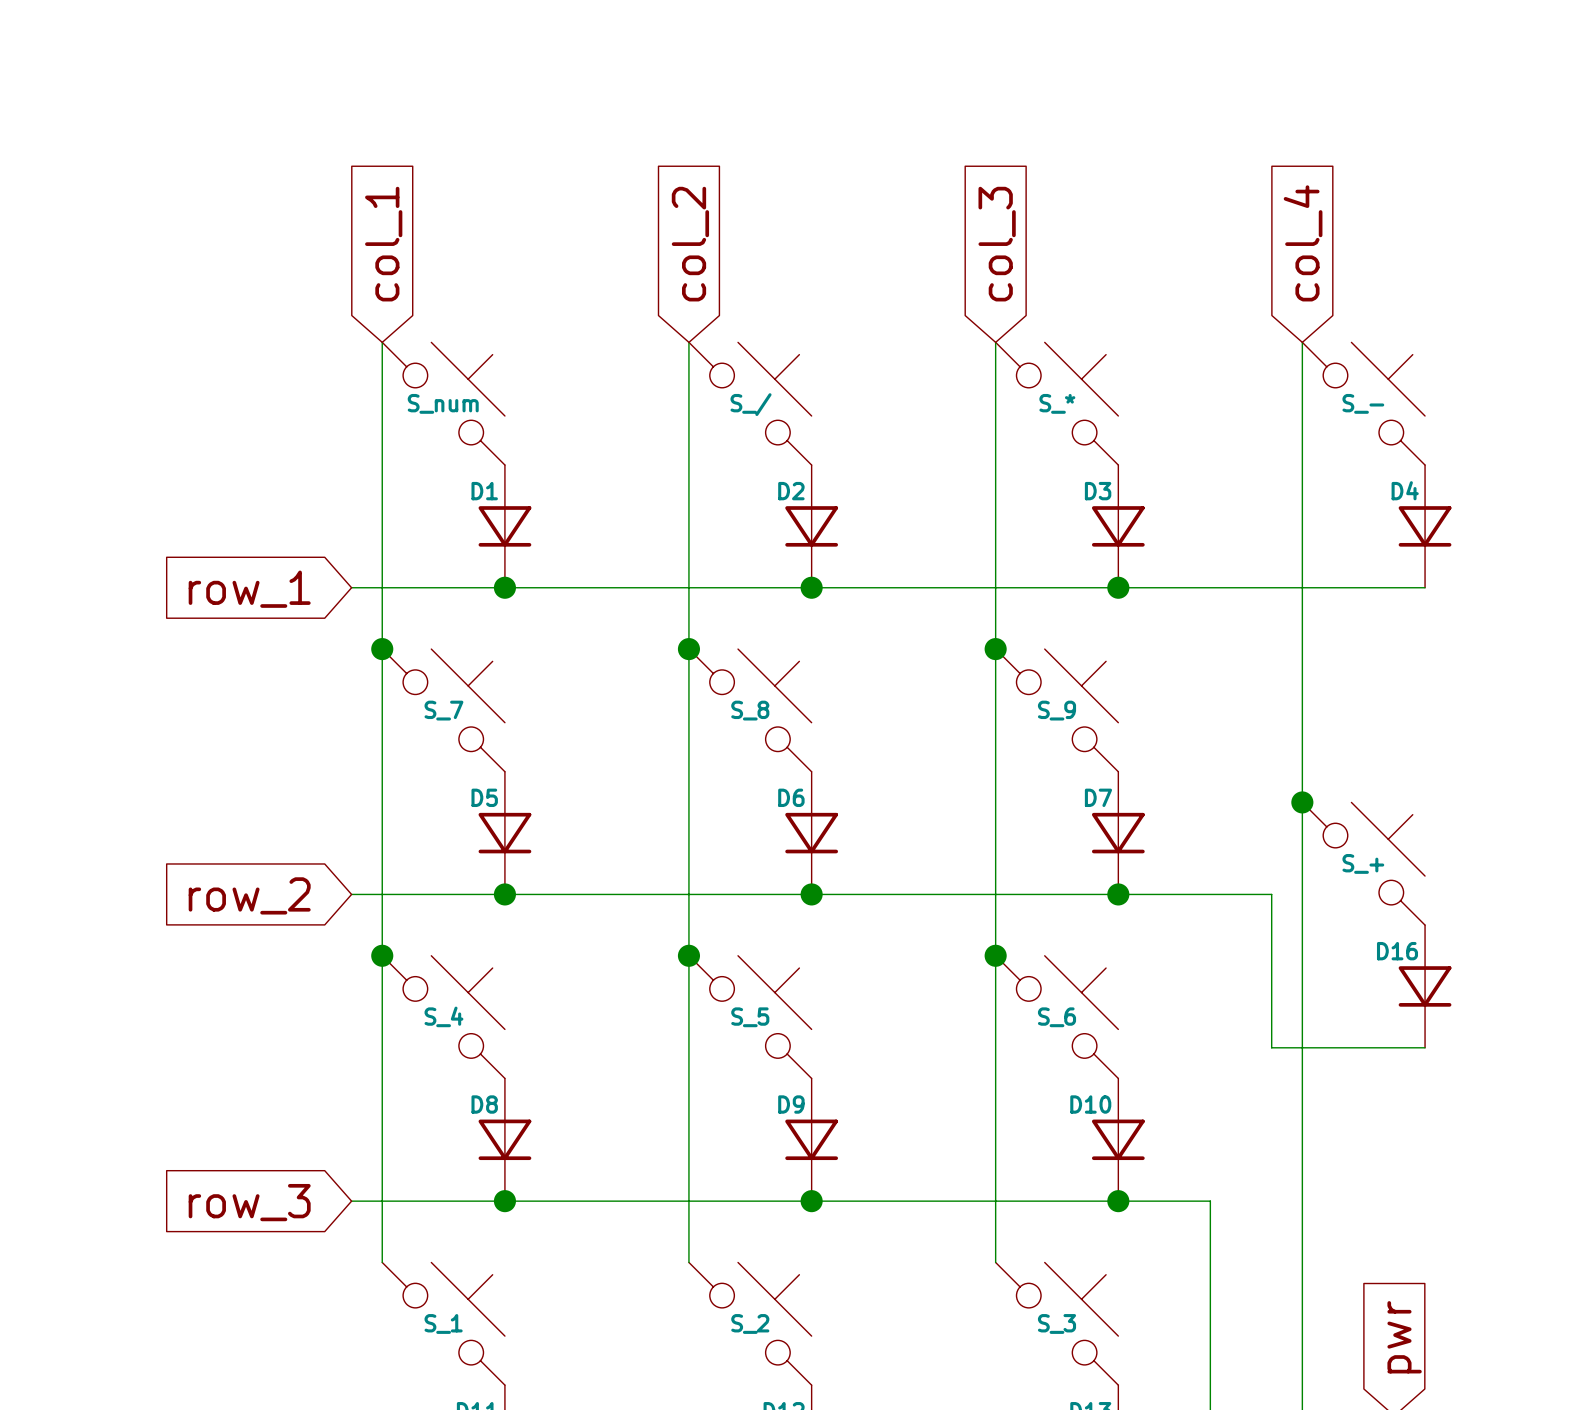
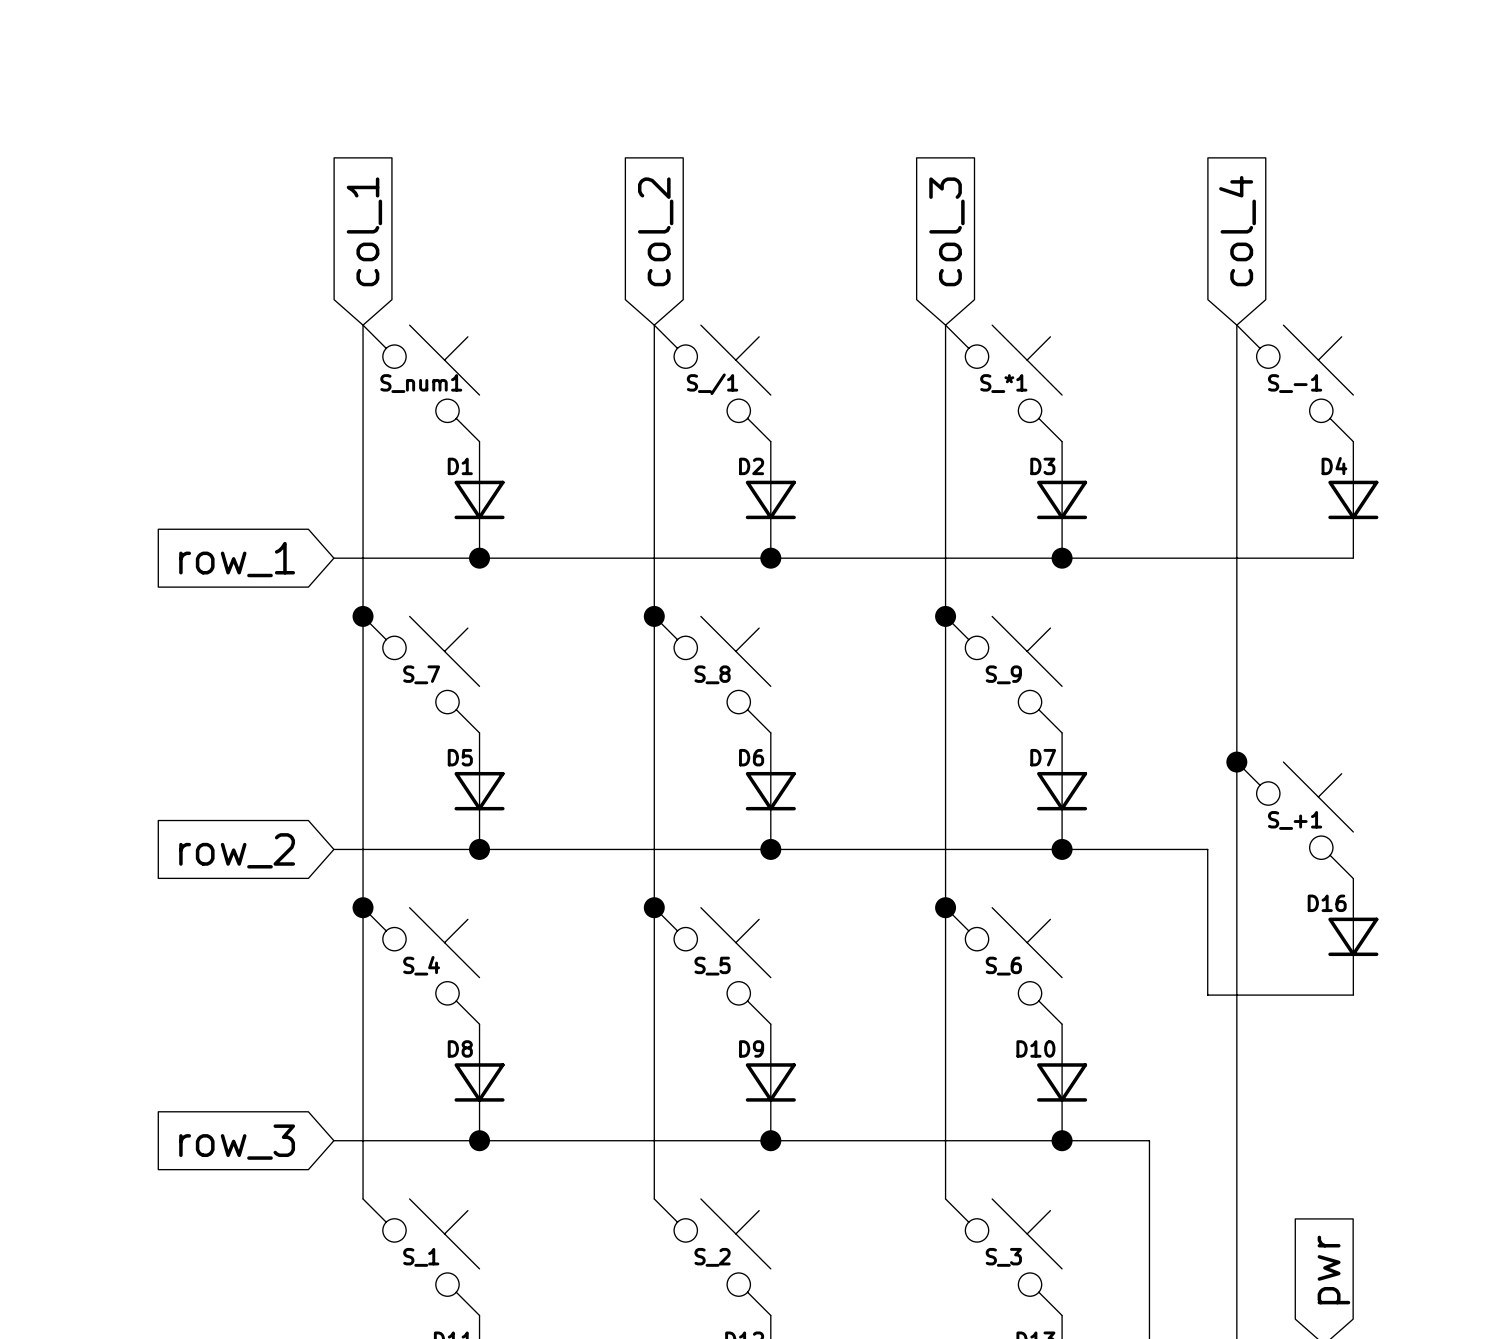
S_num name: S_num (443, 403) -> S_num1 (421, 383)
S_* name: S_* (1057, 403) -> S_*1 (1003, 383)
S_- name: S_- (1363, 403) -> S_-1 (1295, 383)
S_/ name: S_/ (751, 404) -> S_/1 (712, 384)
S_+ name: S_+ (1363, 863) -> S_+1 (1295, 820)

